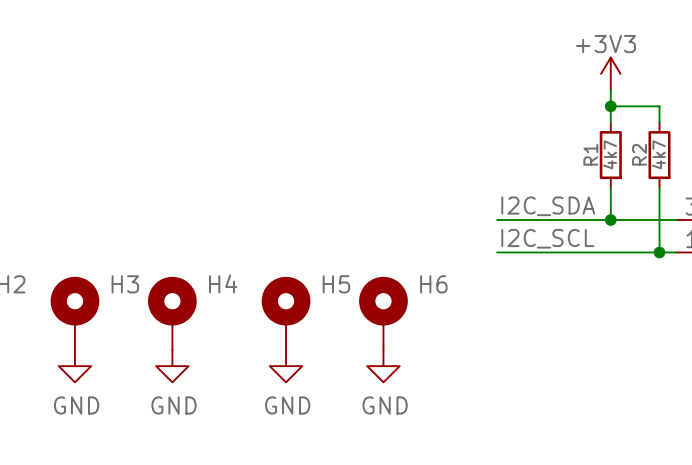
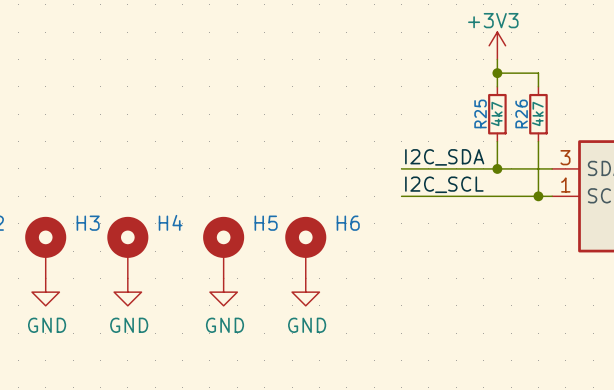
R1 name: R1 (590, 154) -> R25 (480, 113)
R2 name: R2 (639, 154) -> R26 (521, 113)

